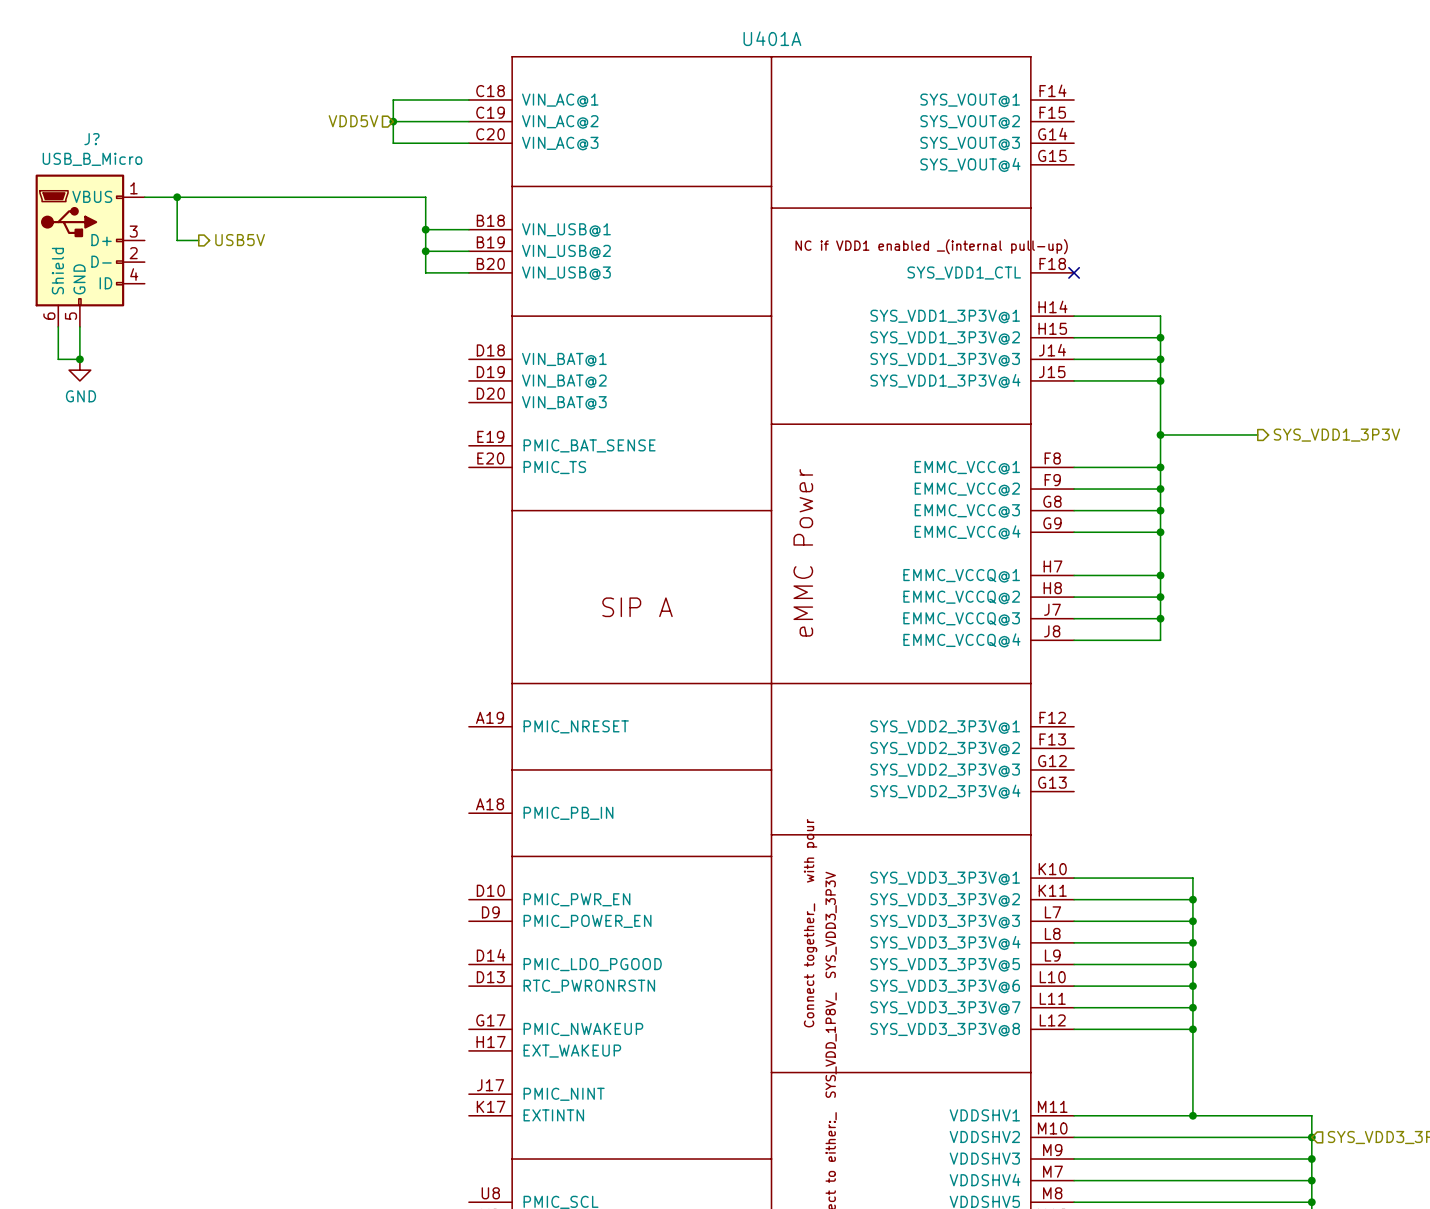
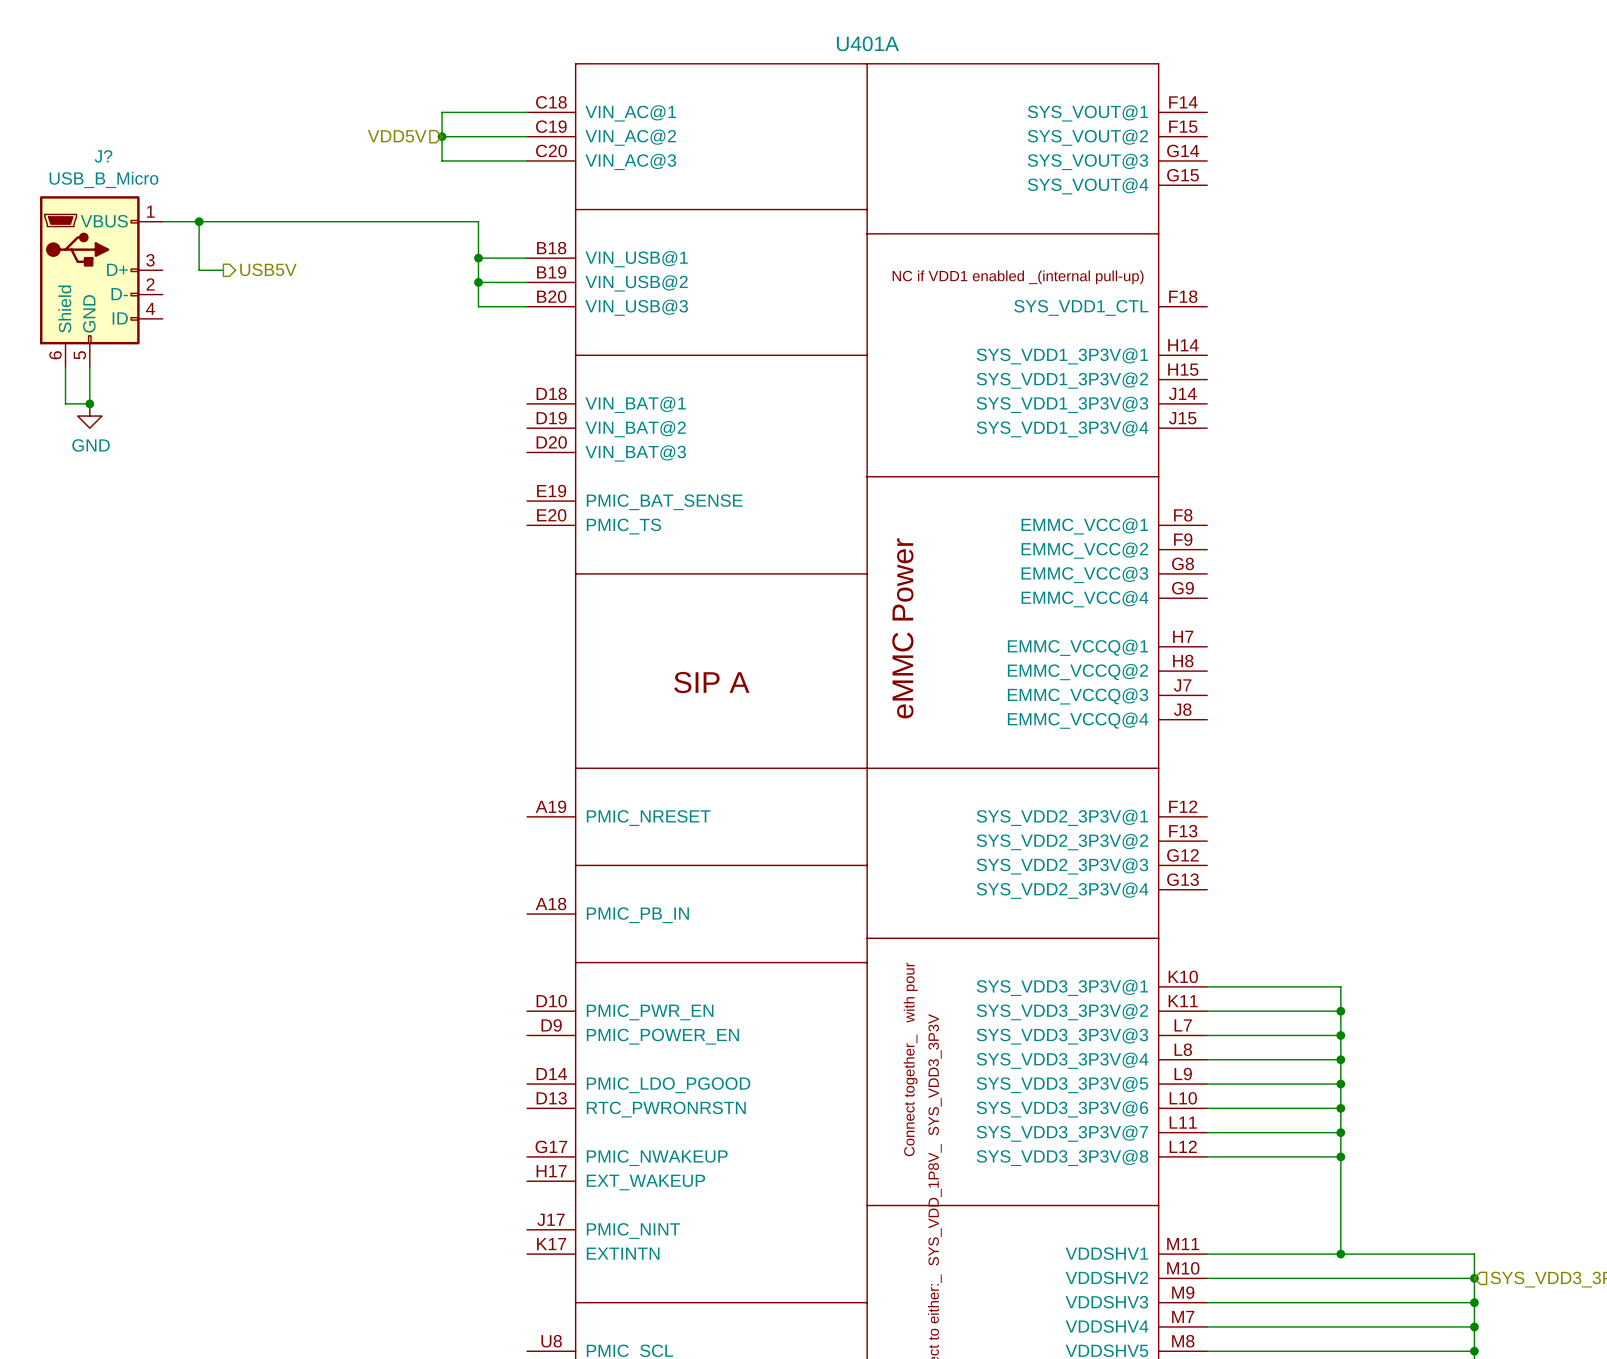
no-connect mark: (1074, 272) -> none
wire: (1074, 316) (1160, 316) (1160, 640) (1074, 640) -> none
wire: (1074, 337) (1160, 337) -> none
junction: (1160, 337) -> none
wire: (1074, 359) (1160, 359) -> none
junction: (1160, 359) -> none
wire: (1074, 380) (1160, 380) -> none
junction: (1160, 380) -> none
wire: (1160, 434) (1257, 434) -> none
junction: (1160, 434) -> none
hierarchical label: SYS_VDD1_3P3V (1336, 435) -> none
wire: (1074, 467) (1160, 467) -> none
junction: (1160, 467) -> none
wire: (1074, 489) (1160, 489) -> none
junction: (1160, 489) -> none
wire: (1074, 510) (1160, 510) -> none
junction: (1160, 510) -> none
wire: (1074, 532) (1160, 532) -> none
junction: (1160, 532) -> none
wire: (1074, 575) (1160, 575) -> none
junction: (1160, 575) -> none
wire: (1074, 597) (1160, 597) -> none
junction: (1160, 597) -> none
wire: (1074, 618) (1160, 618) -> none
junction: (1160, 618) -> none

